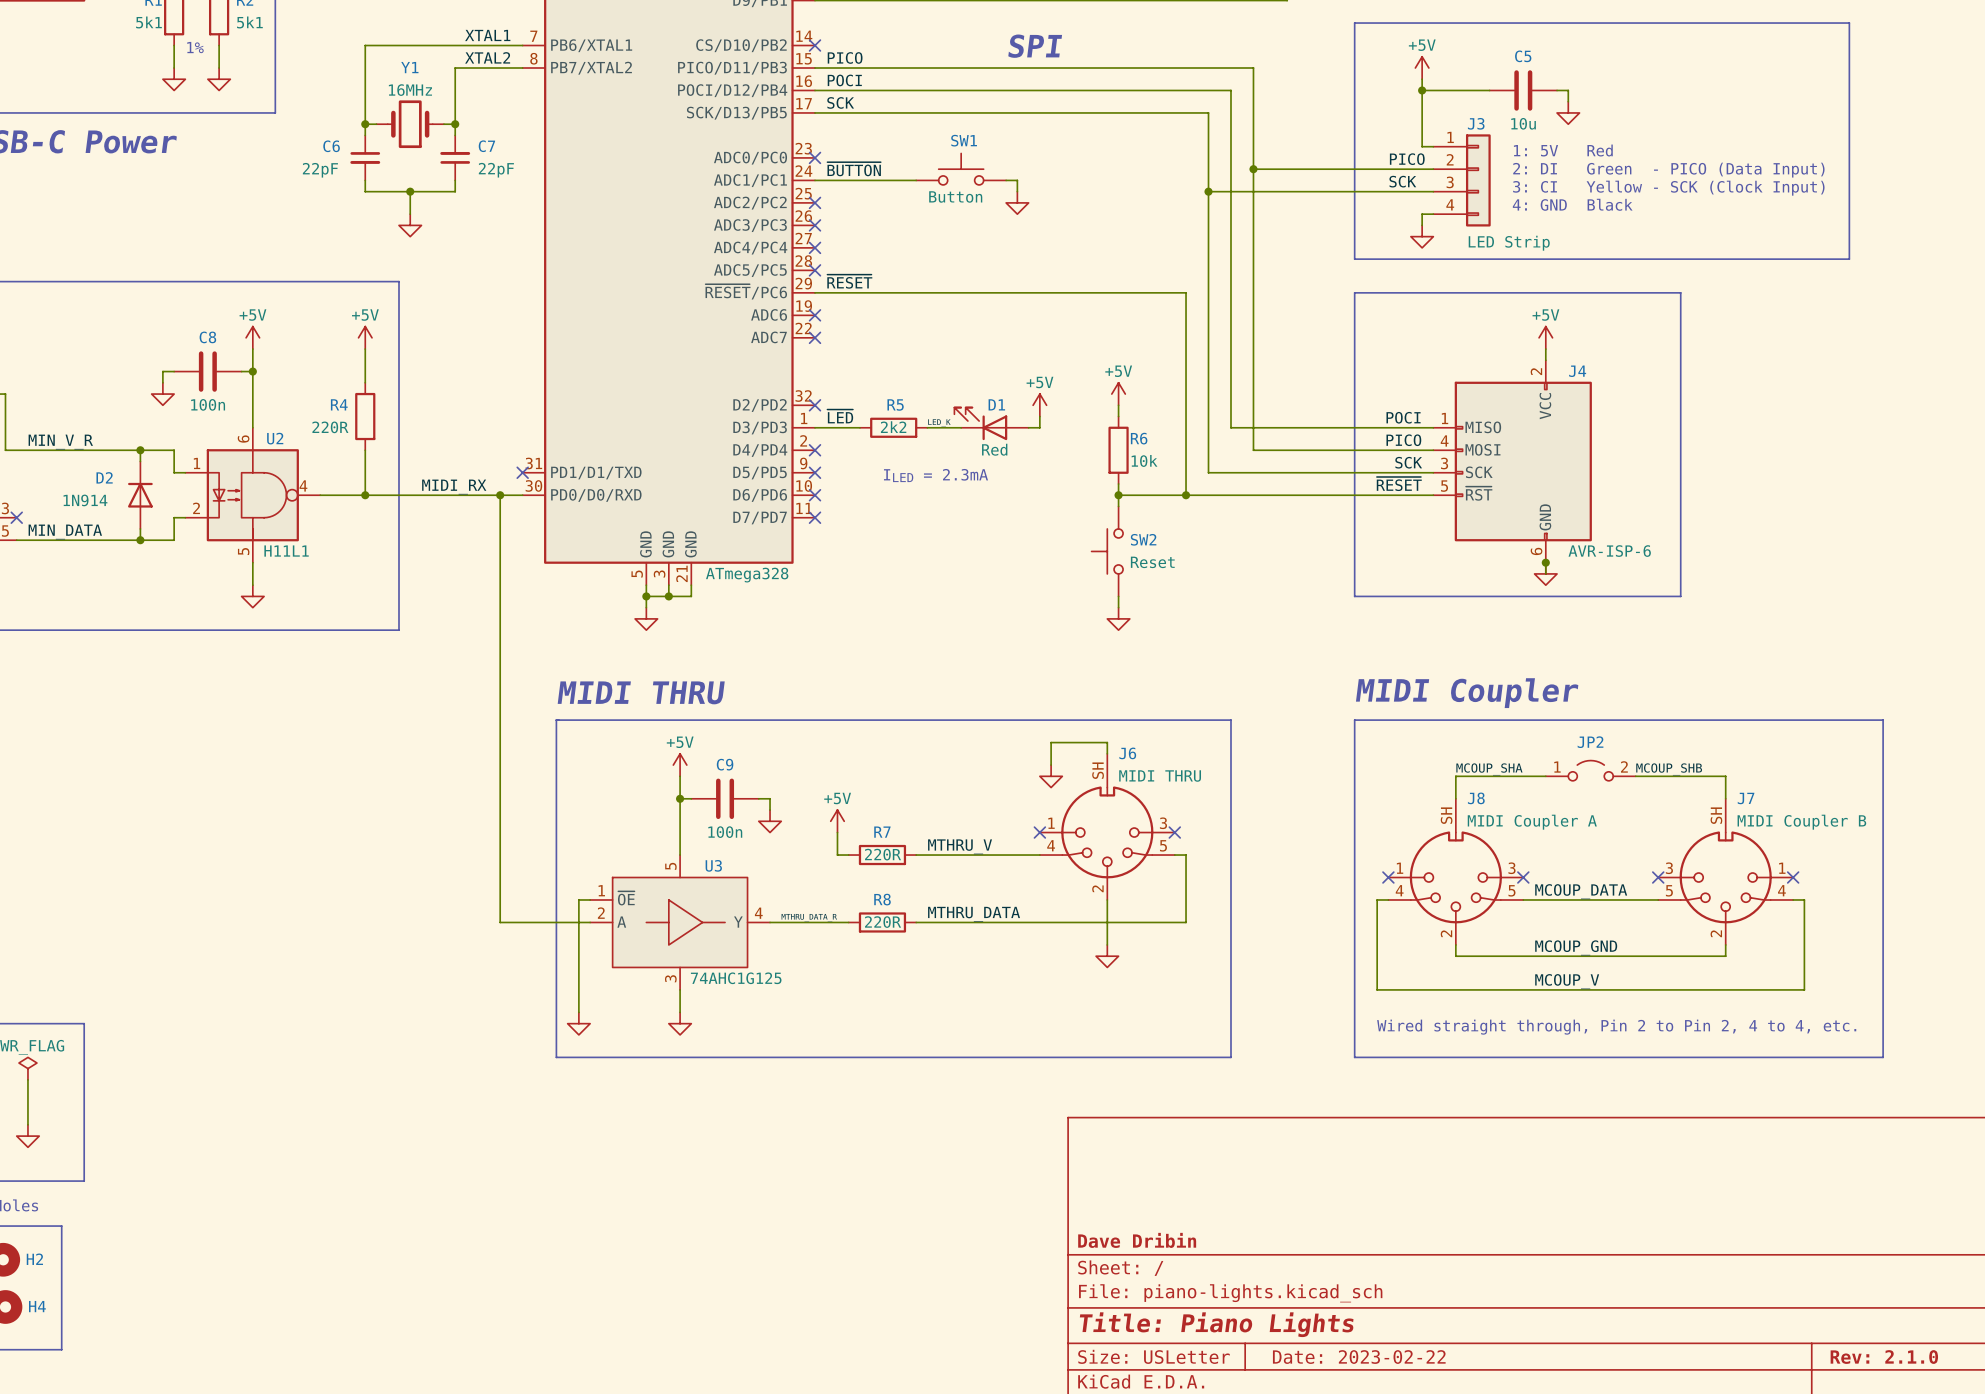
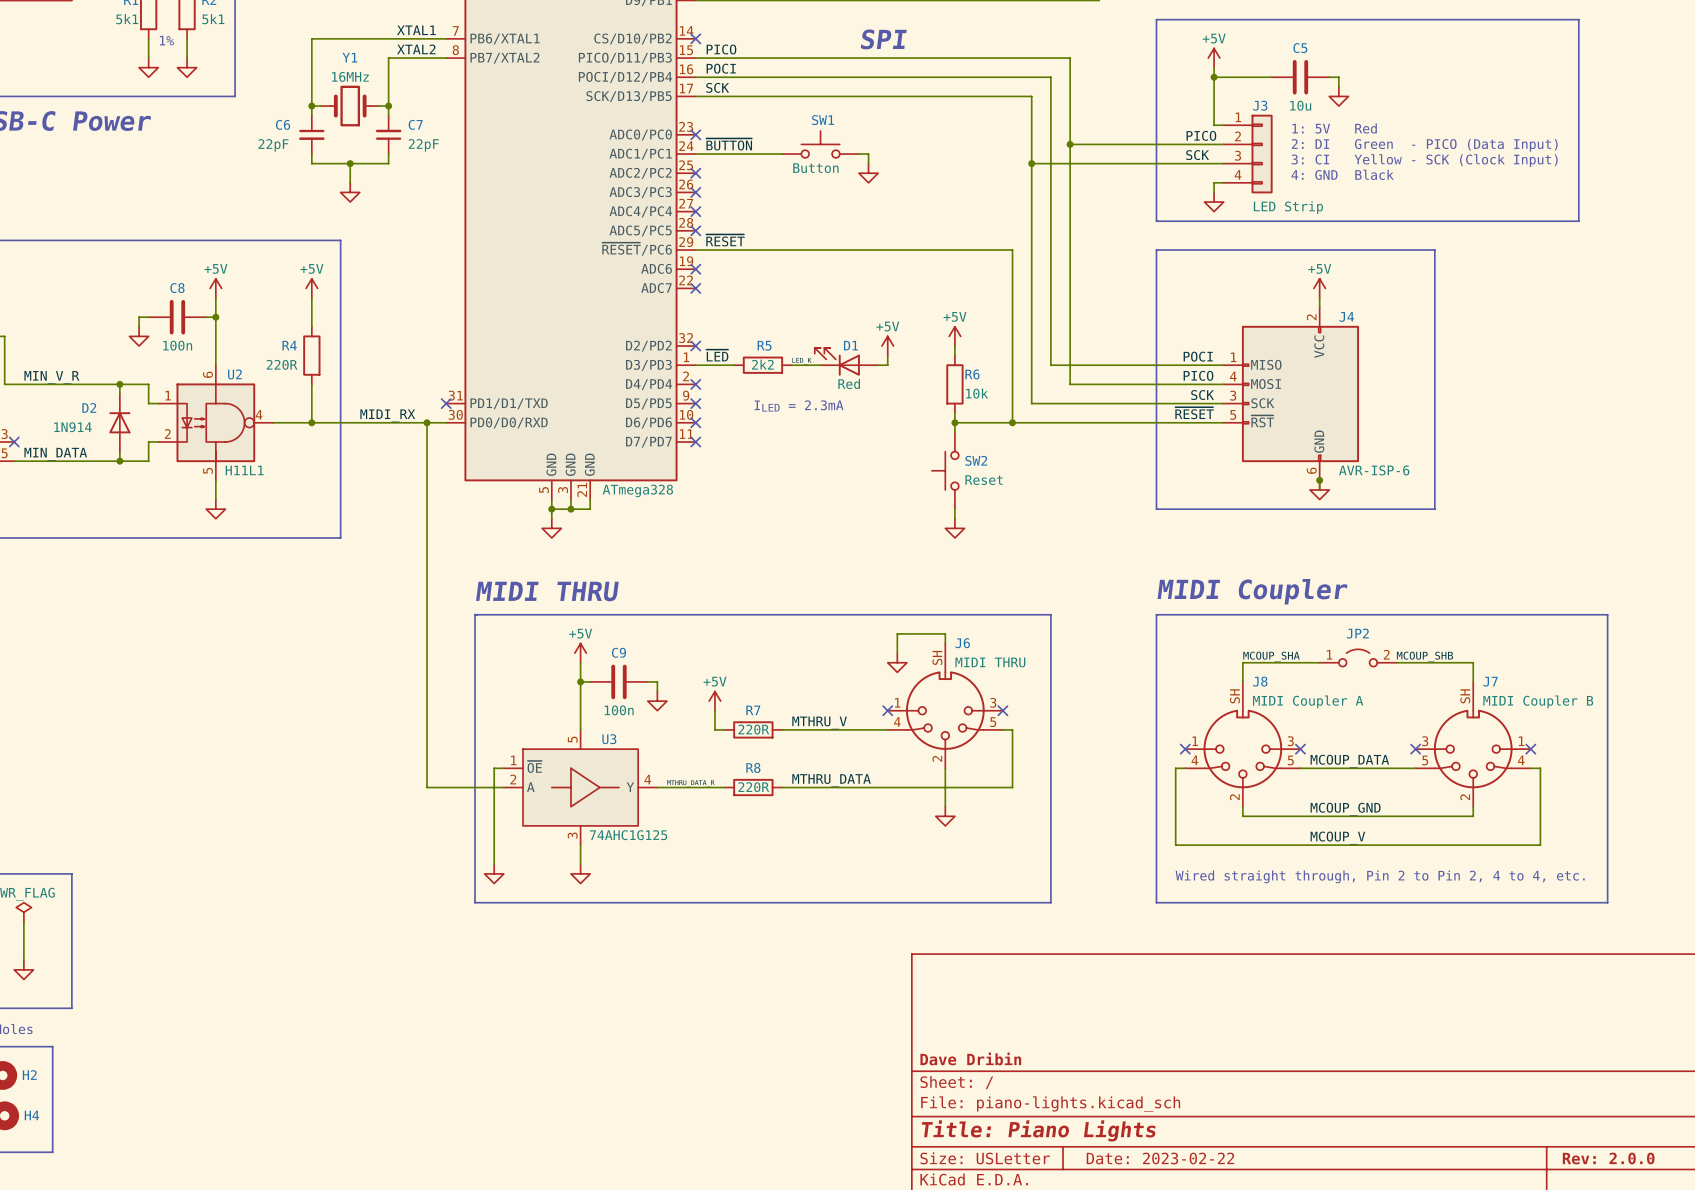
title block: Rev: 2.1.0 (1884, 1357) -> Rev: 2.0.0 (1608, 1158)

